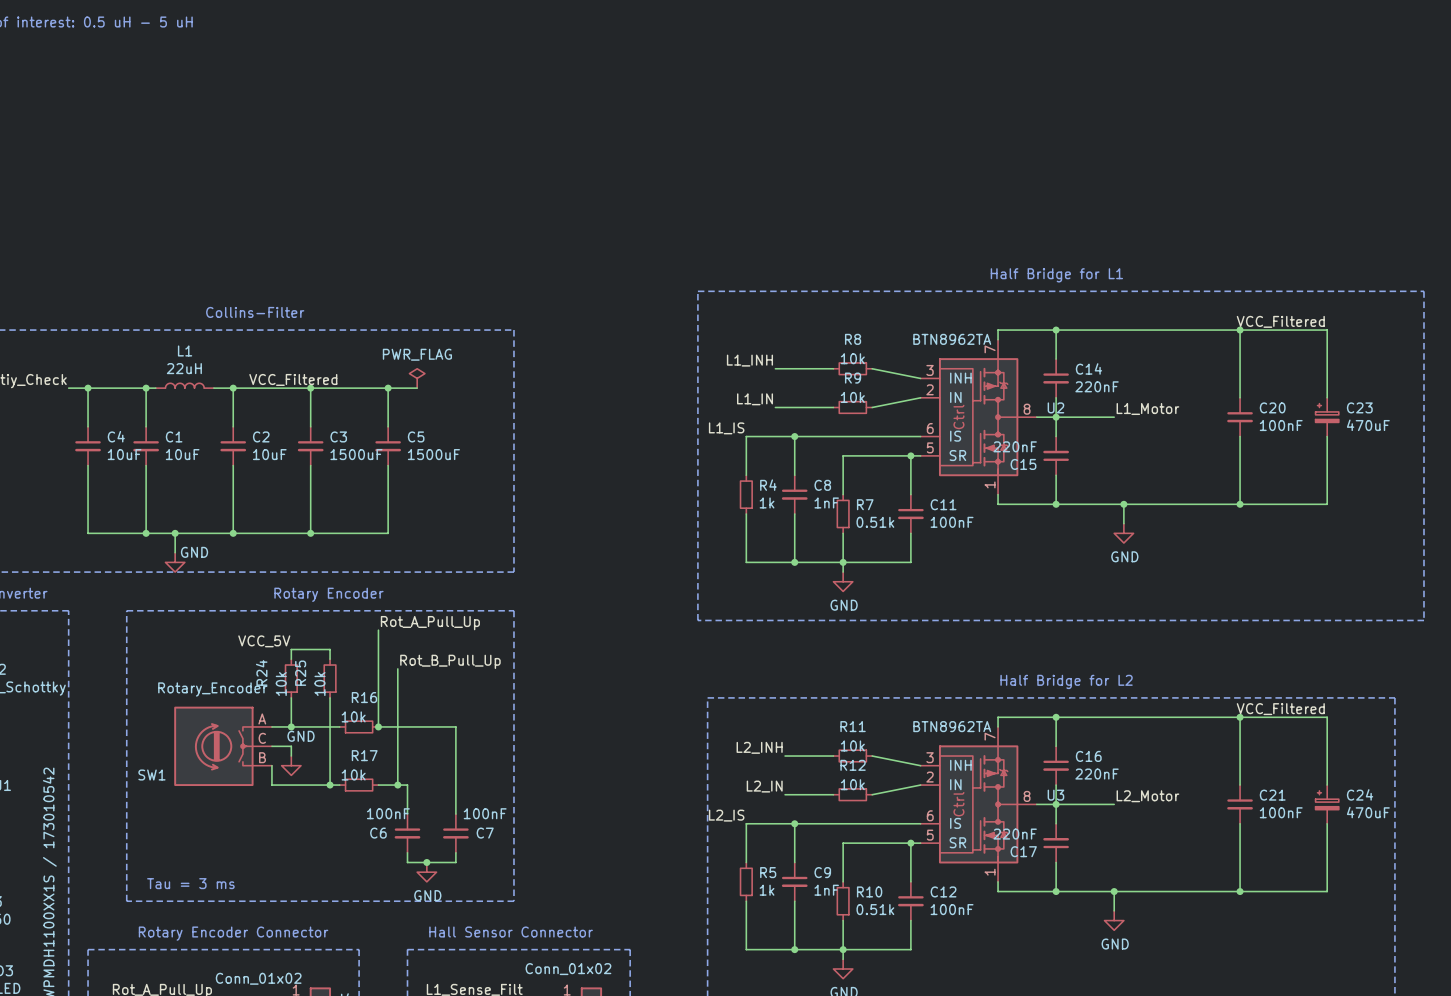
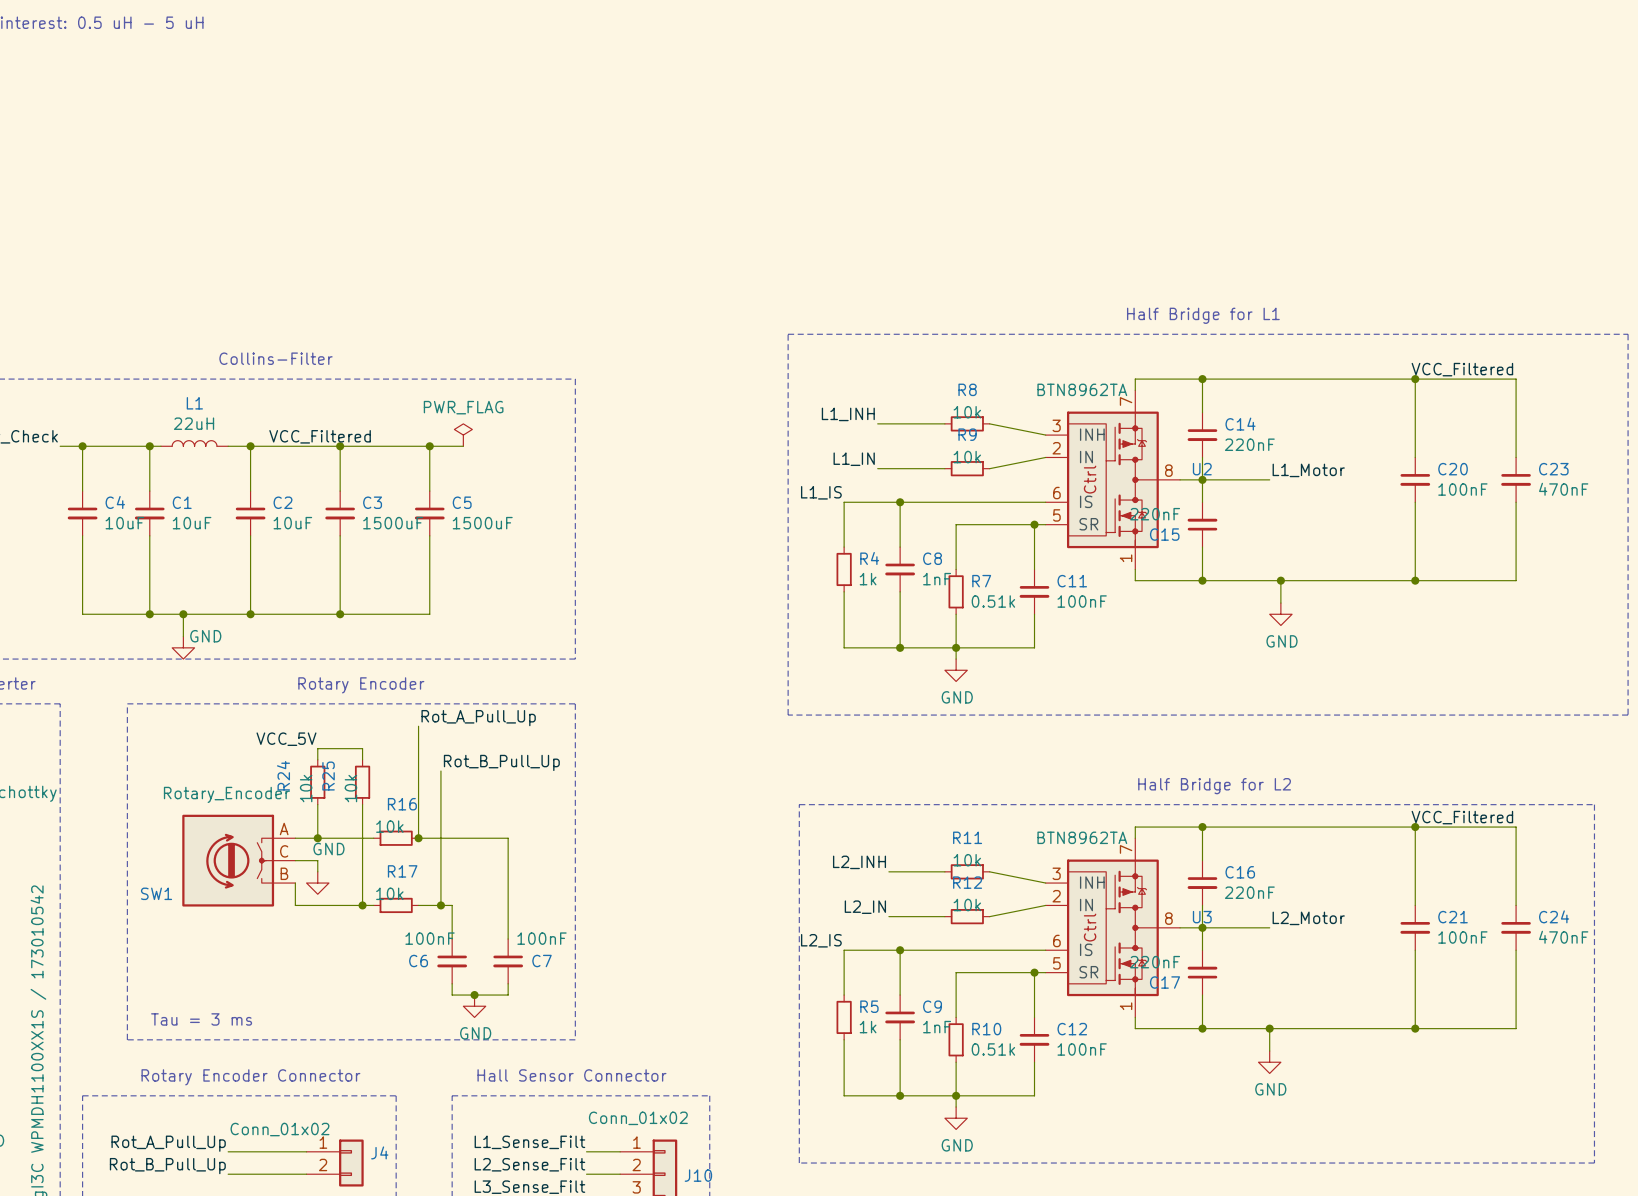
C23 symbol: [1315, 397, 1339, 437] -> [1501, 457, 1531, 503]
C23 value: 470uF (1368, 425) -> 470nF (1563, 489)
C24 symbol: [1315, 785, 1339, 824] -> [1501, 905, 1531, 951]
C24 value: 470uF (1368, 812) -> 470nF (1563, 937)

